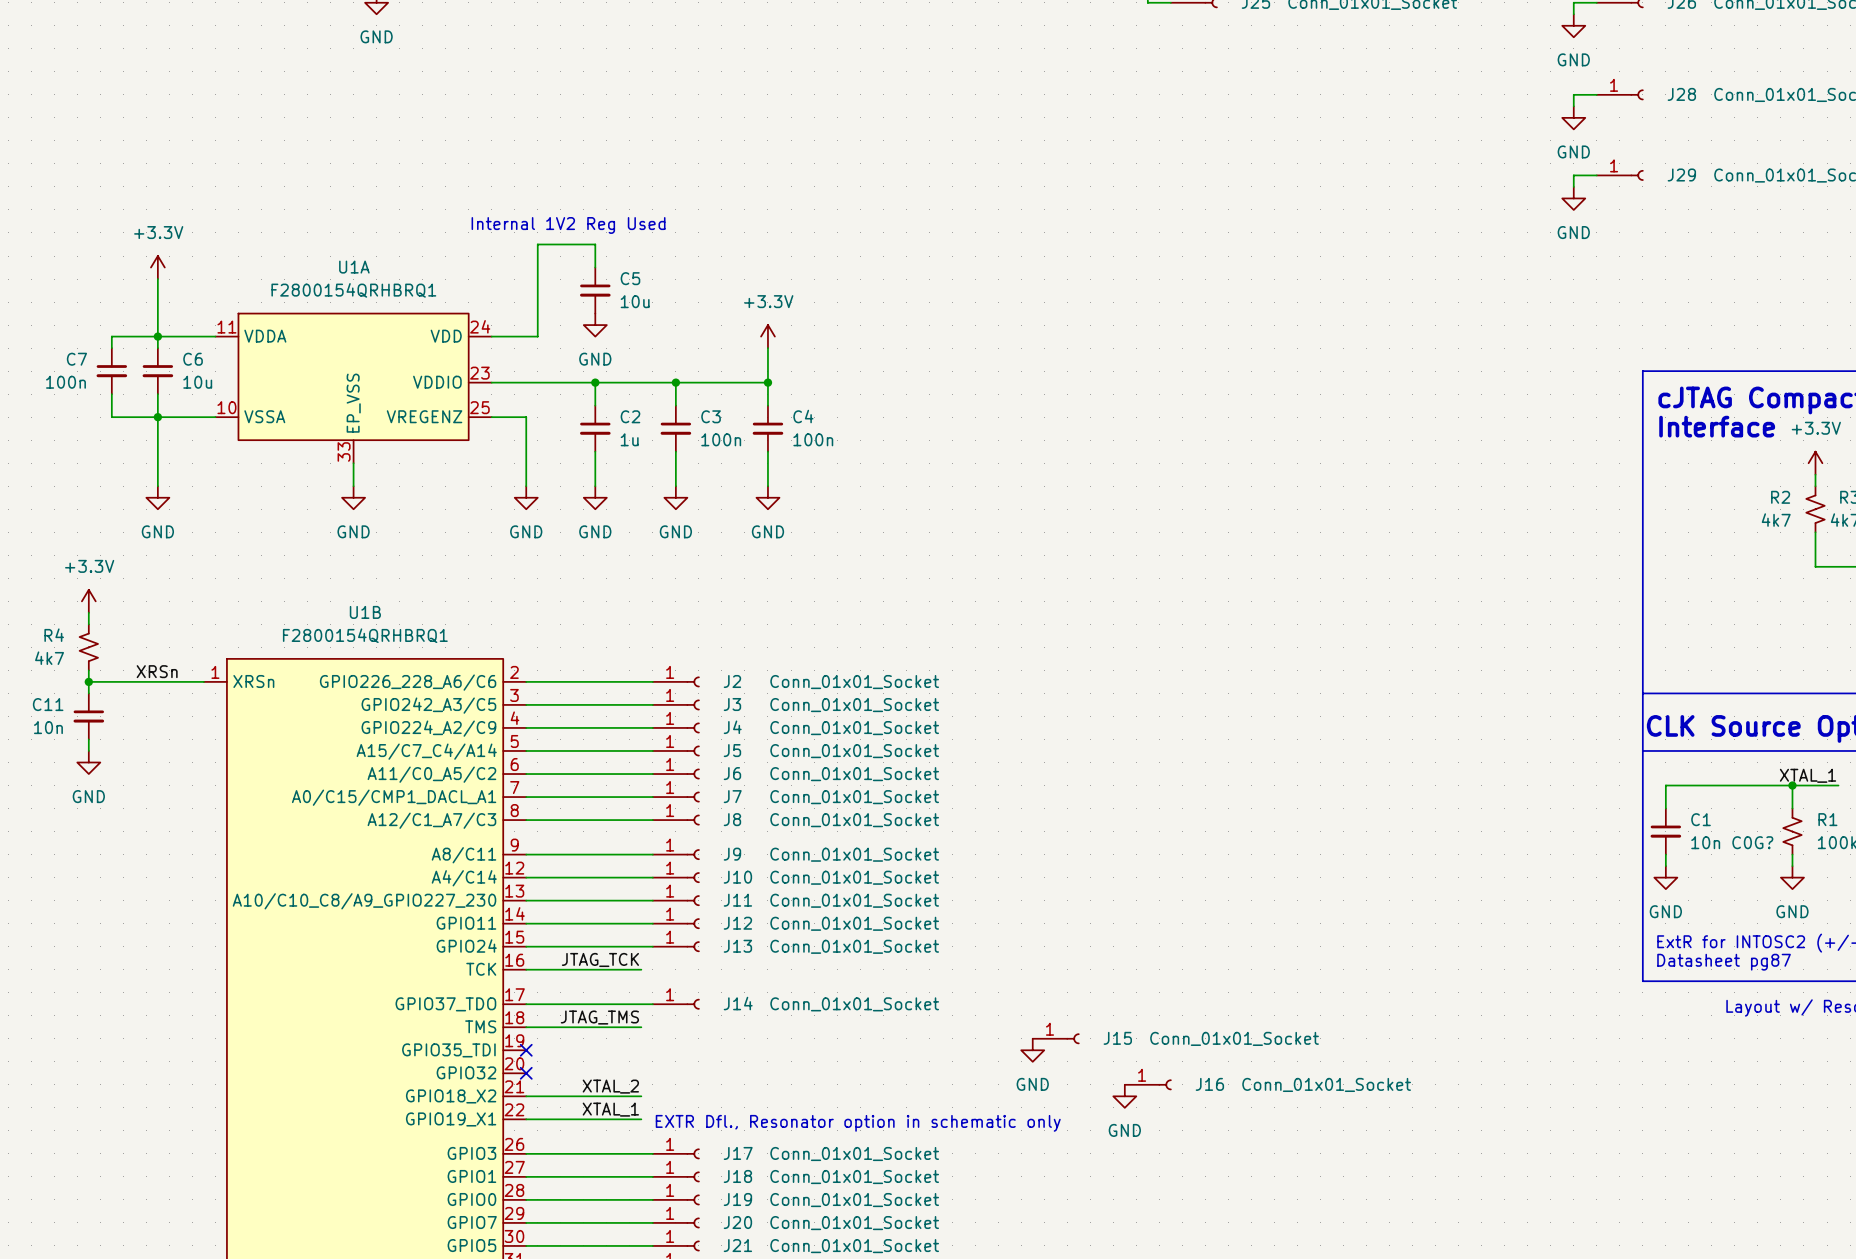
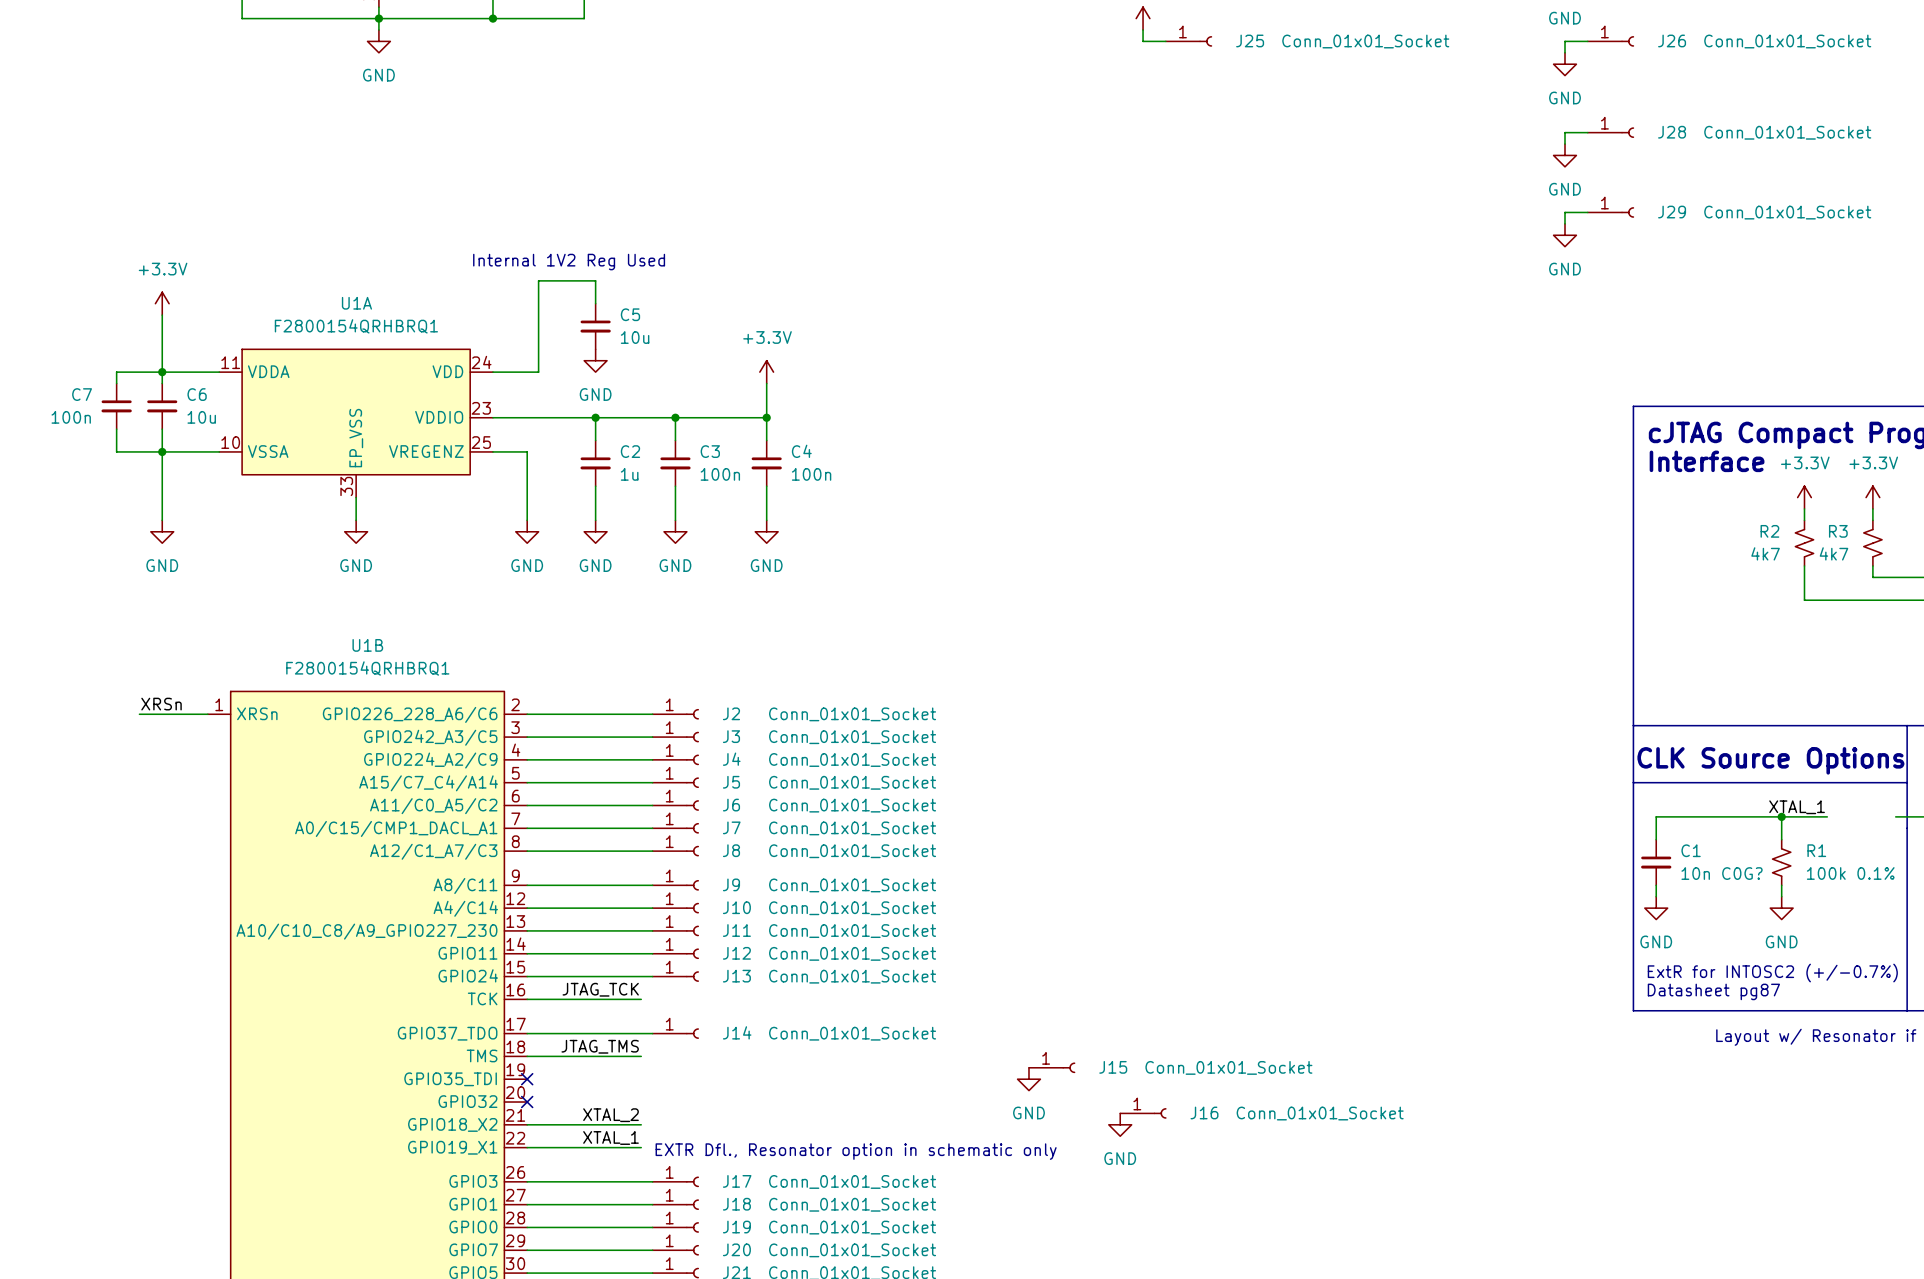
power symbol: +3.3V (88, 601) -> none
wire: (88, 612) (88, 624) -> none
R4: 4k7 (88, 647) -> none
wire: (88, 670) (88, 693) -> none
wire: (88, 681) (134, 681) -> none
junction: (88, 681) -> none
C11: 10n (88, 716) -> none
wire: (88, 739) (88, 750) -> none
power symbol: GND (88, 762) -> none

